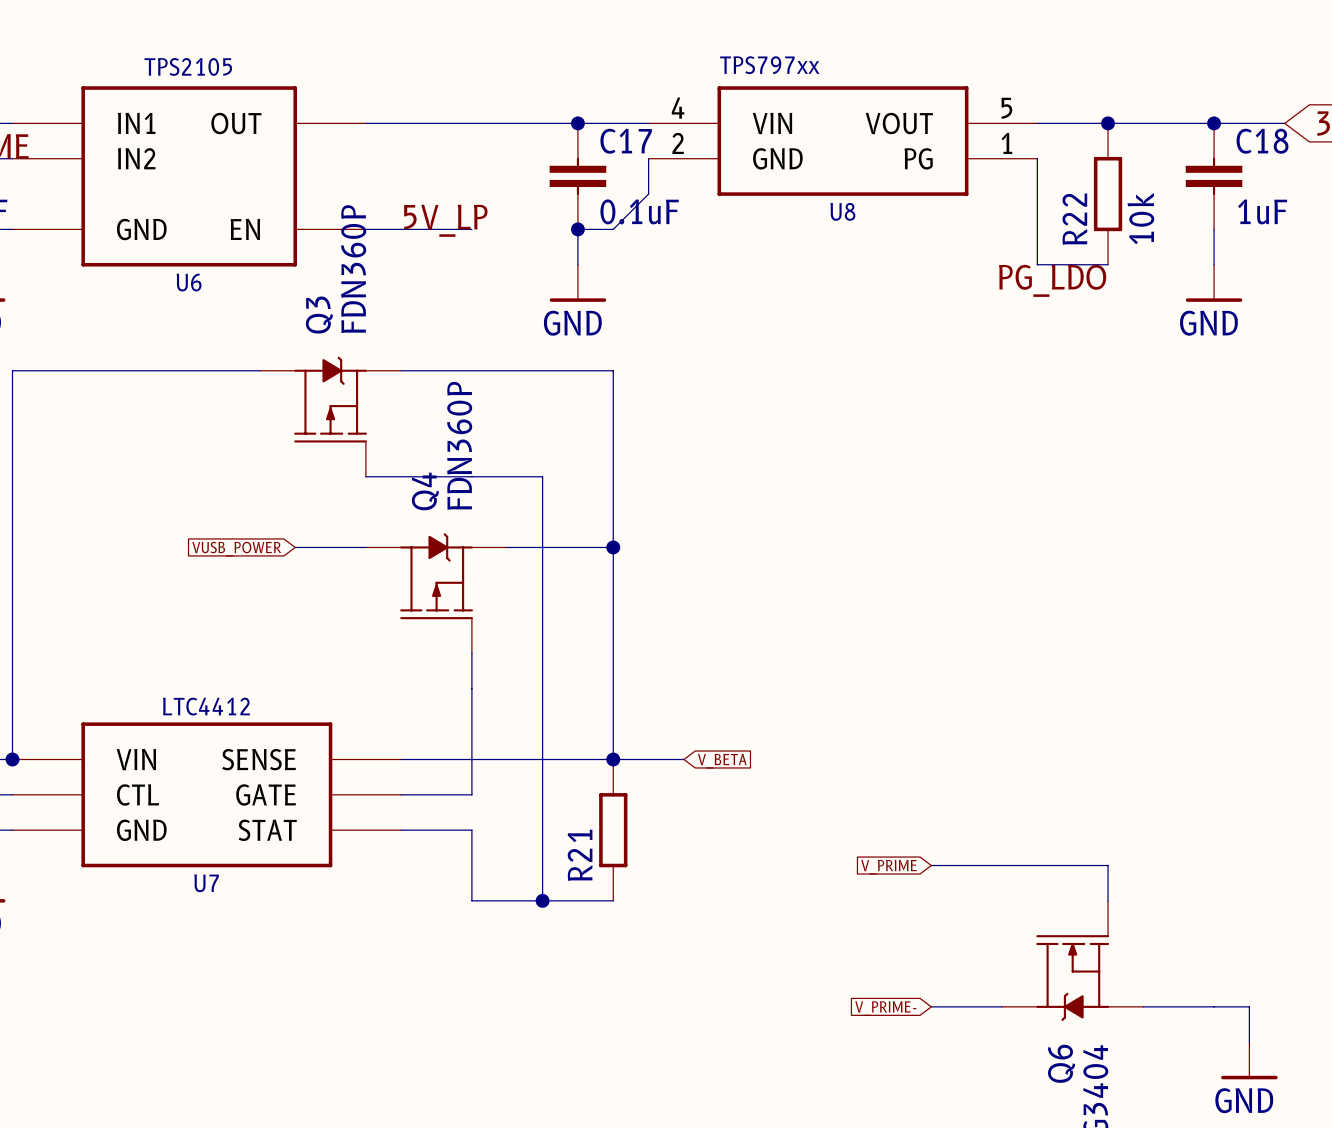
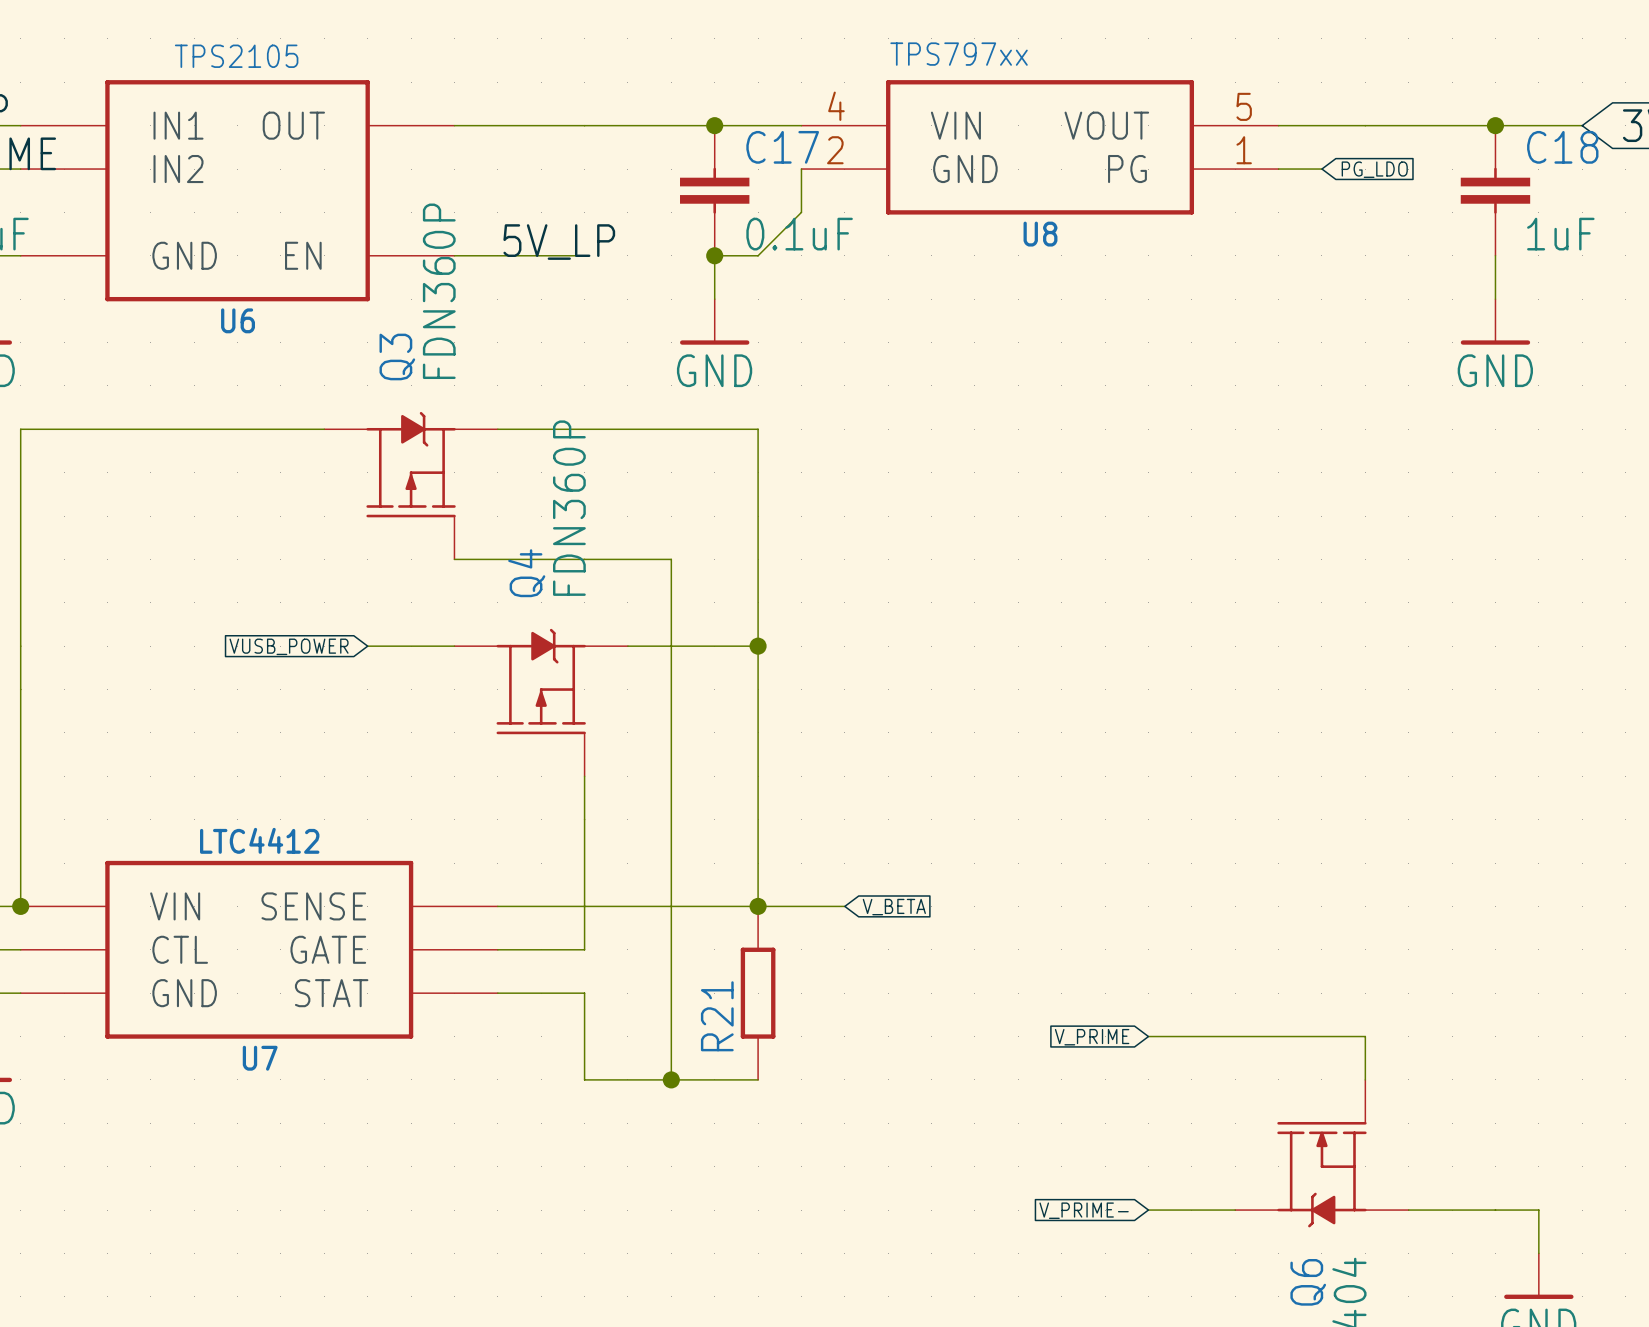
junction: (1108, 123) -> none
wire: (1037, 158) (1037, 264) (1108, 264) -> (1278, 169) (1321, 169)
global label: none -> PG_LDO (1374, 169)
R22: 10k (1108, 194) -> none
label: PG_LDO (1052, 280) -> none

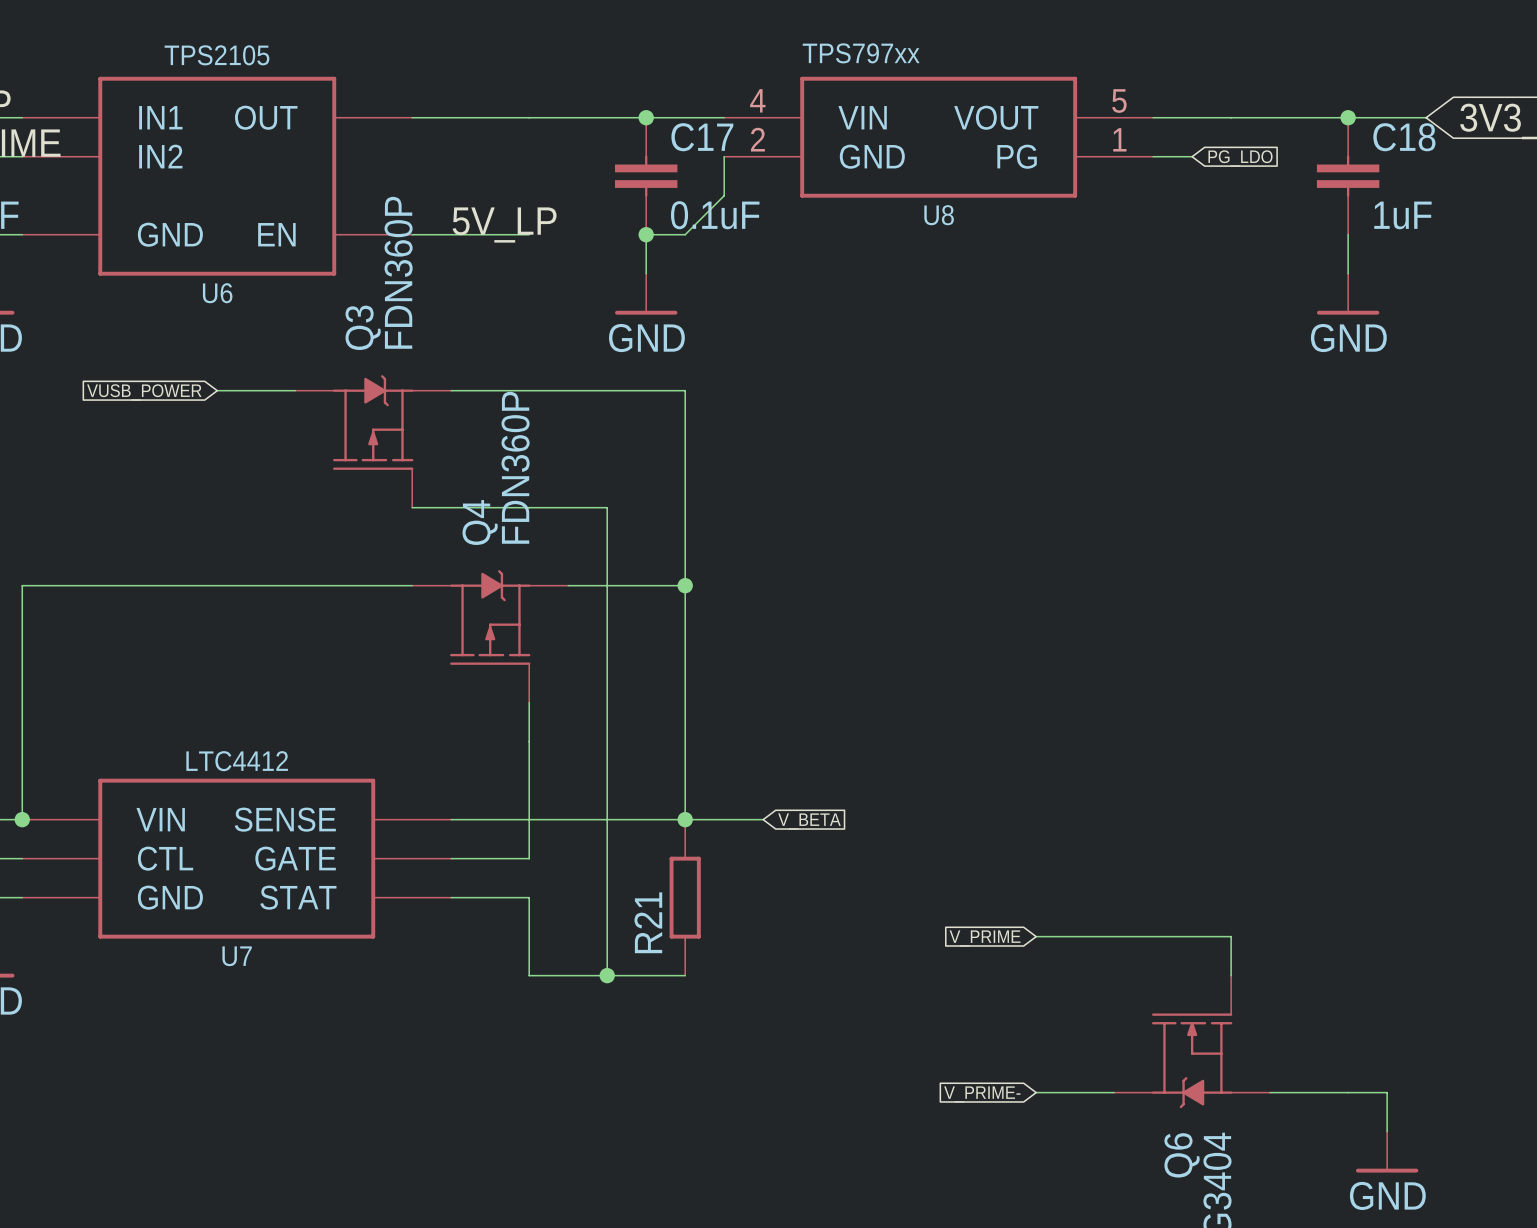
wire: (237, 429) (20, 429) (20, 646) -> (334, 585) (22, 585)
global label position: VUSB_POWER (289, 646) -> VUSB_POWER (144, 392)

